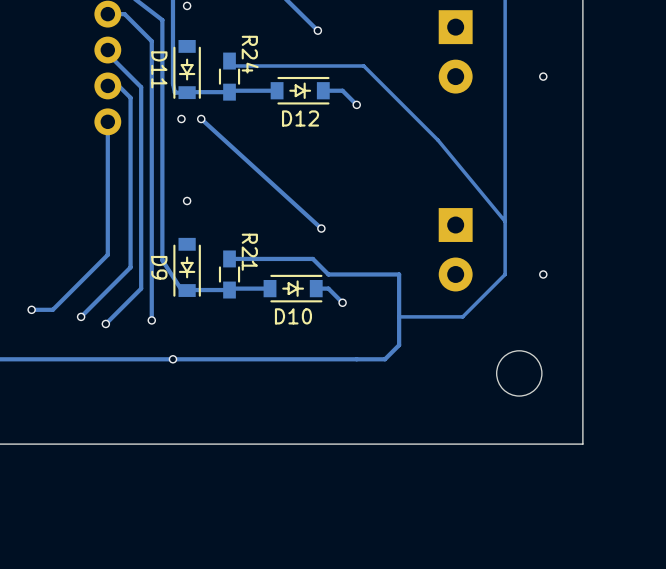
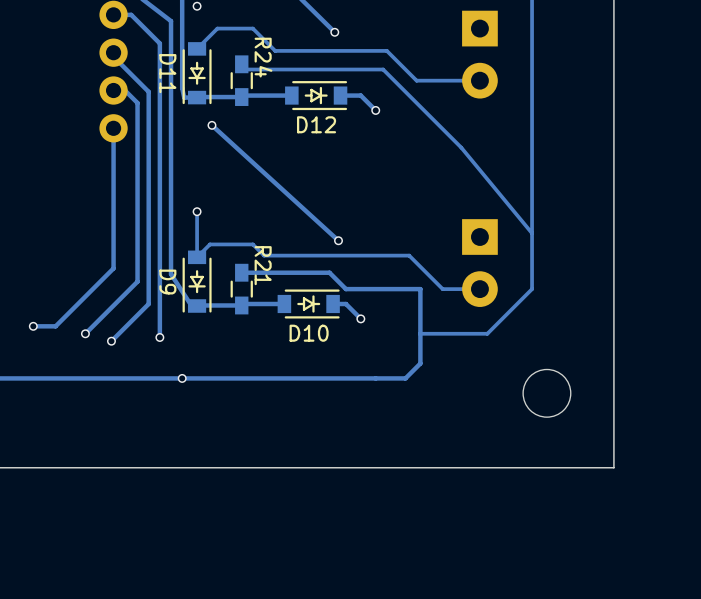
track: none -> (197, 48) (217, 28) (252, 28) (275, 50) (386, 50) (416, 80) (479, 80)
via: (543, 76) -> none
via: (181, 119) -> none
track: none -> (197, 210) (197, 257) (209, 244) (252, 244) (264, 255) (409, 255) (442, 289) (479, 289)
via: (543, 274) -> none

